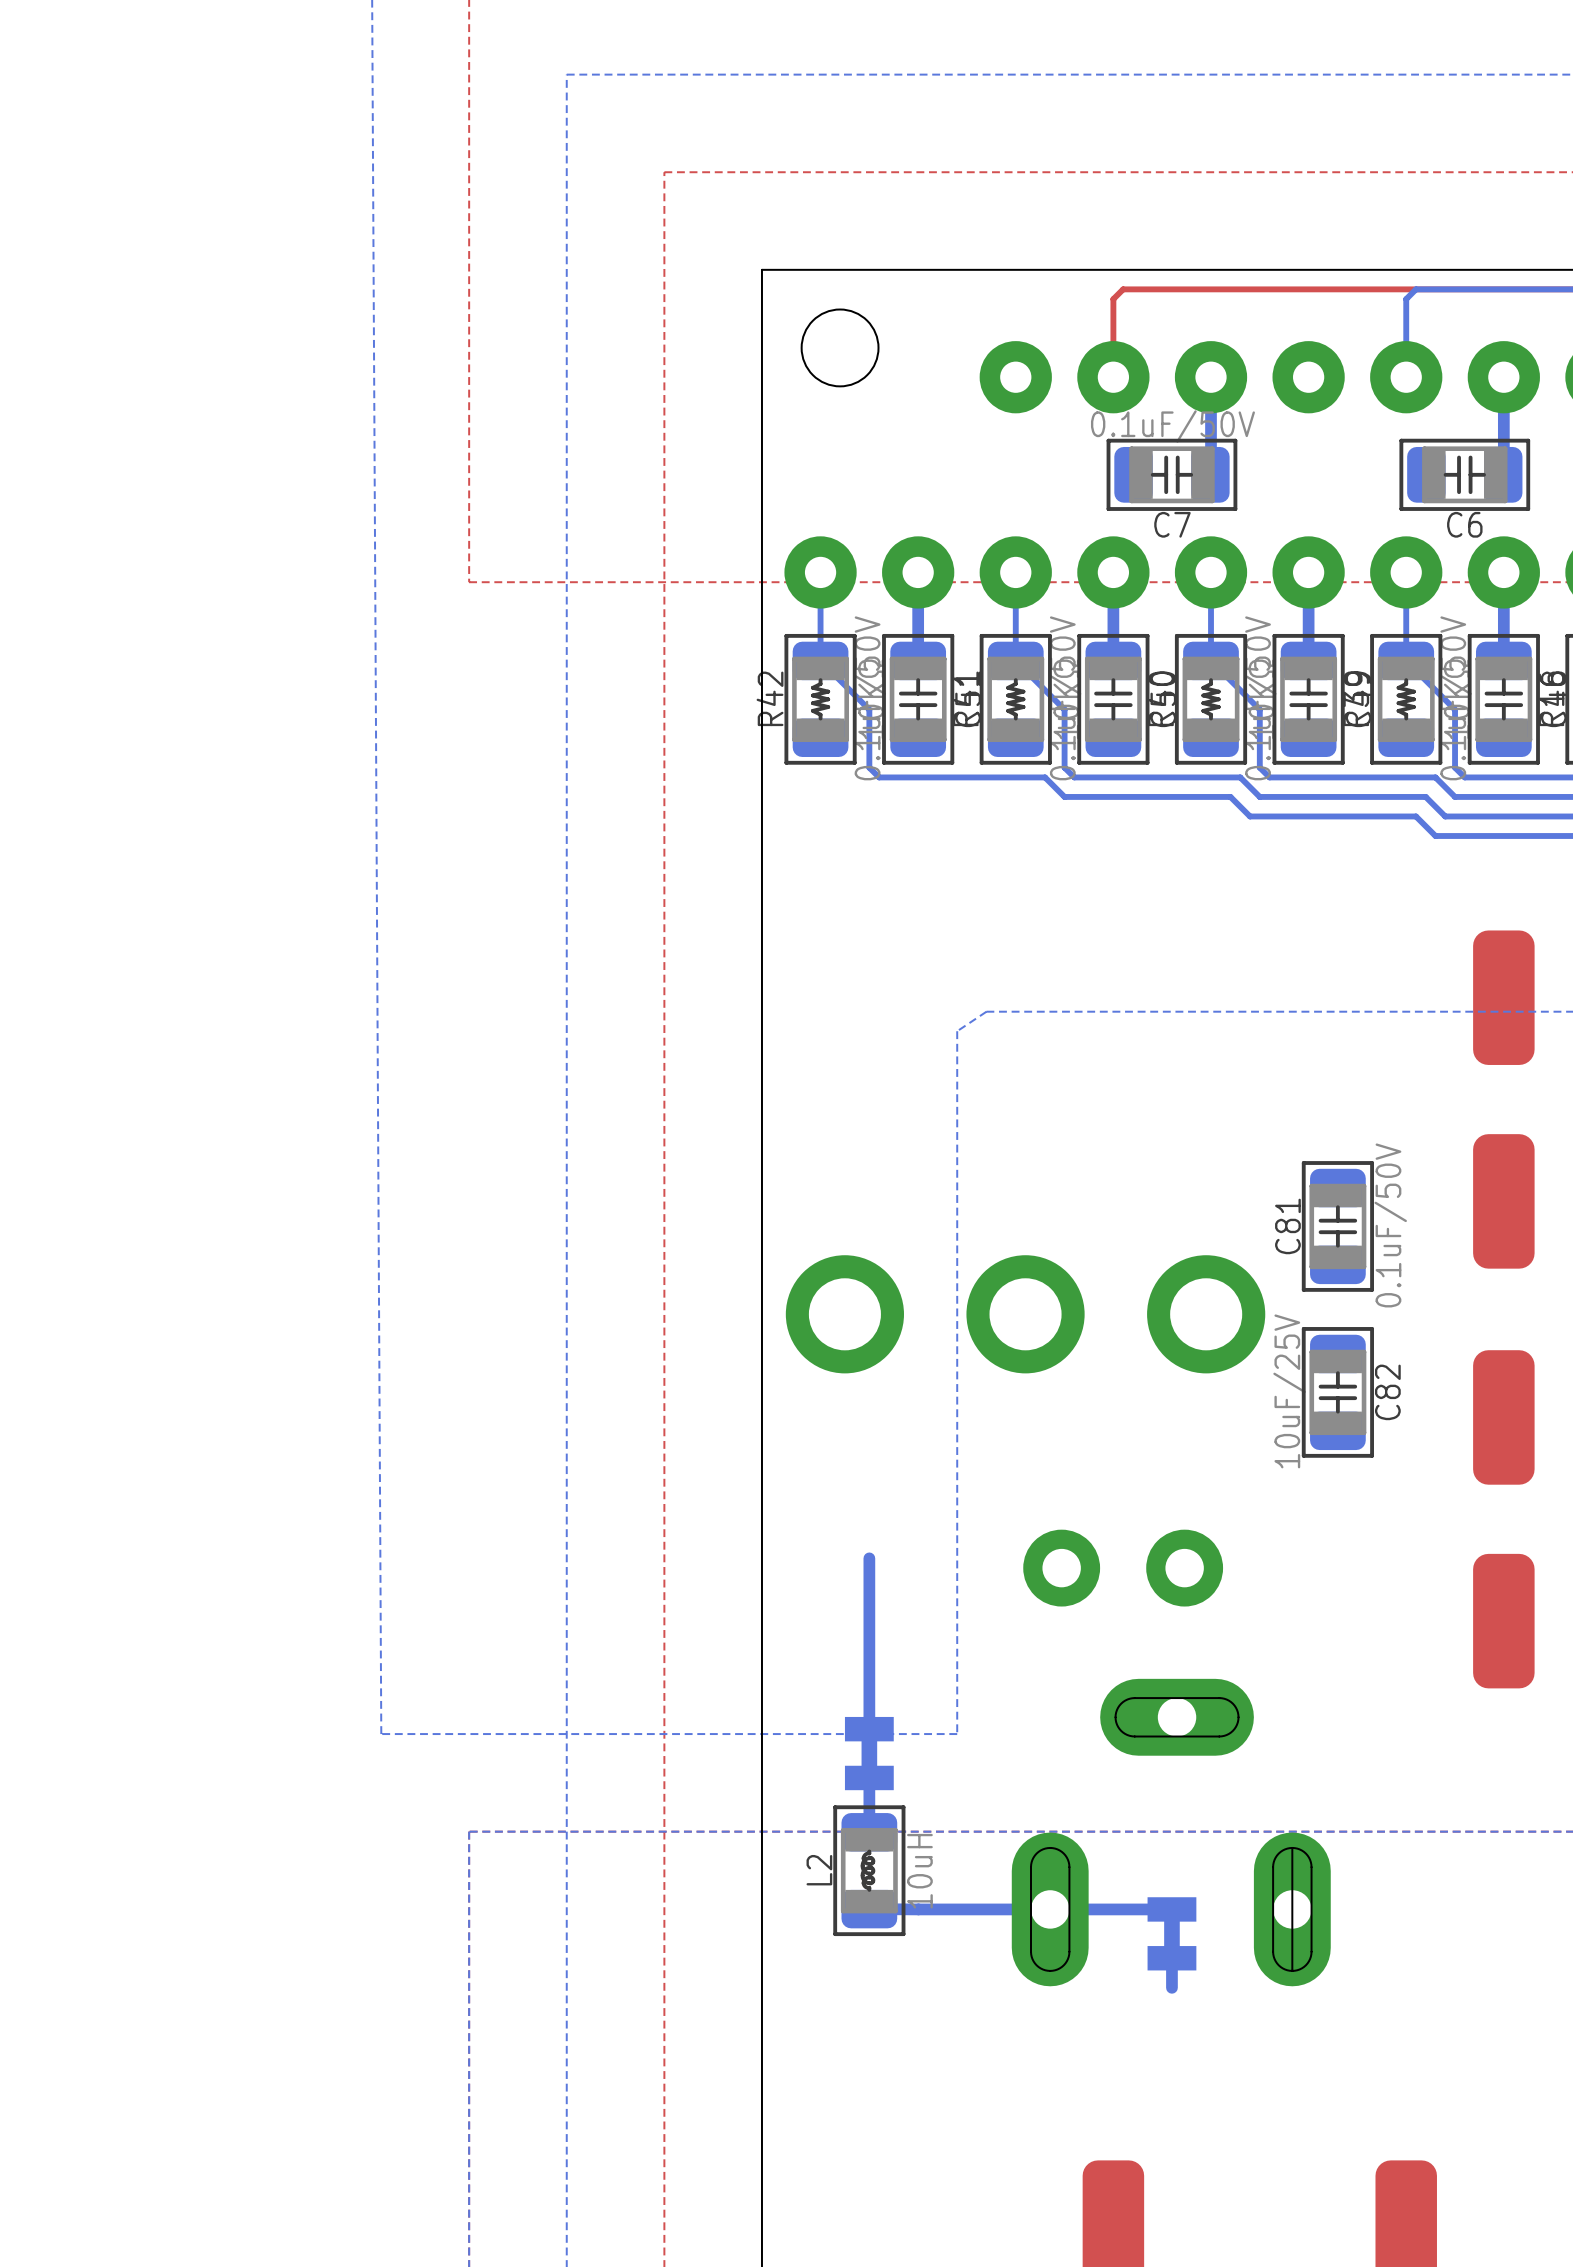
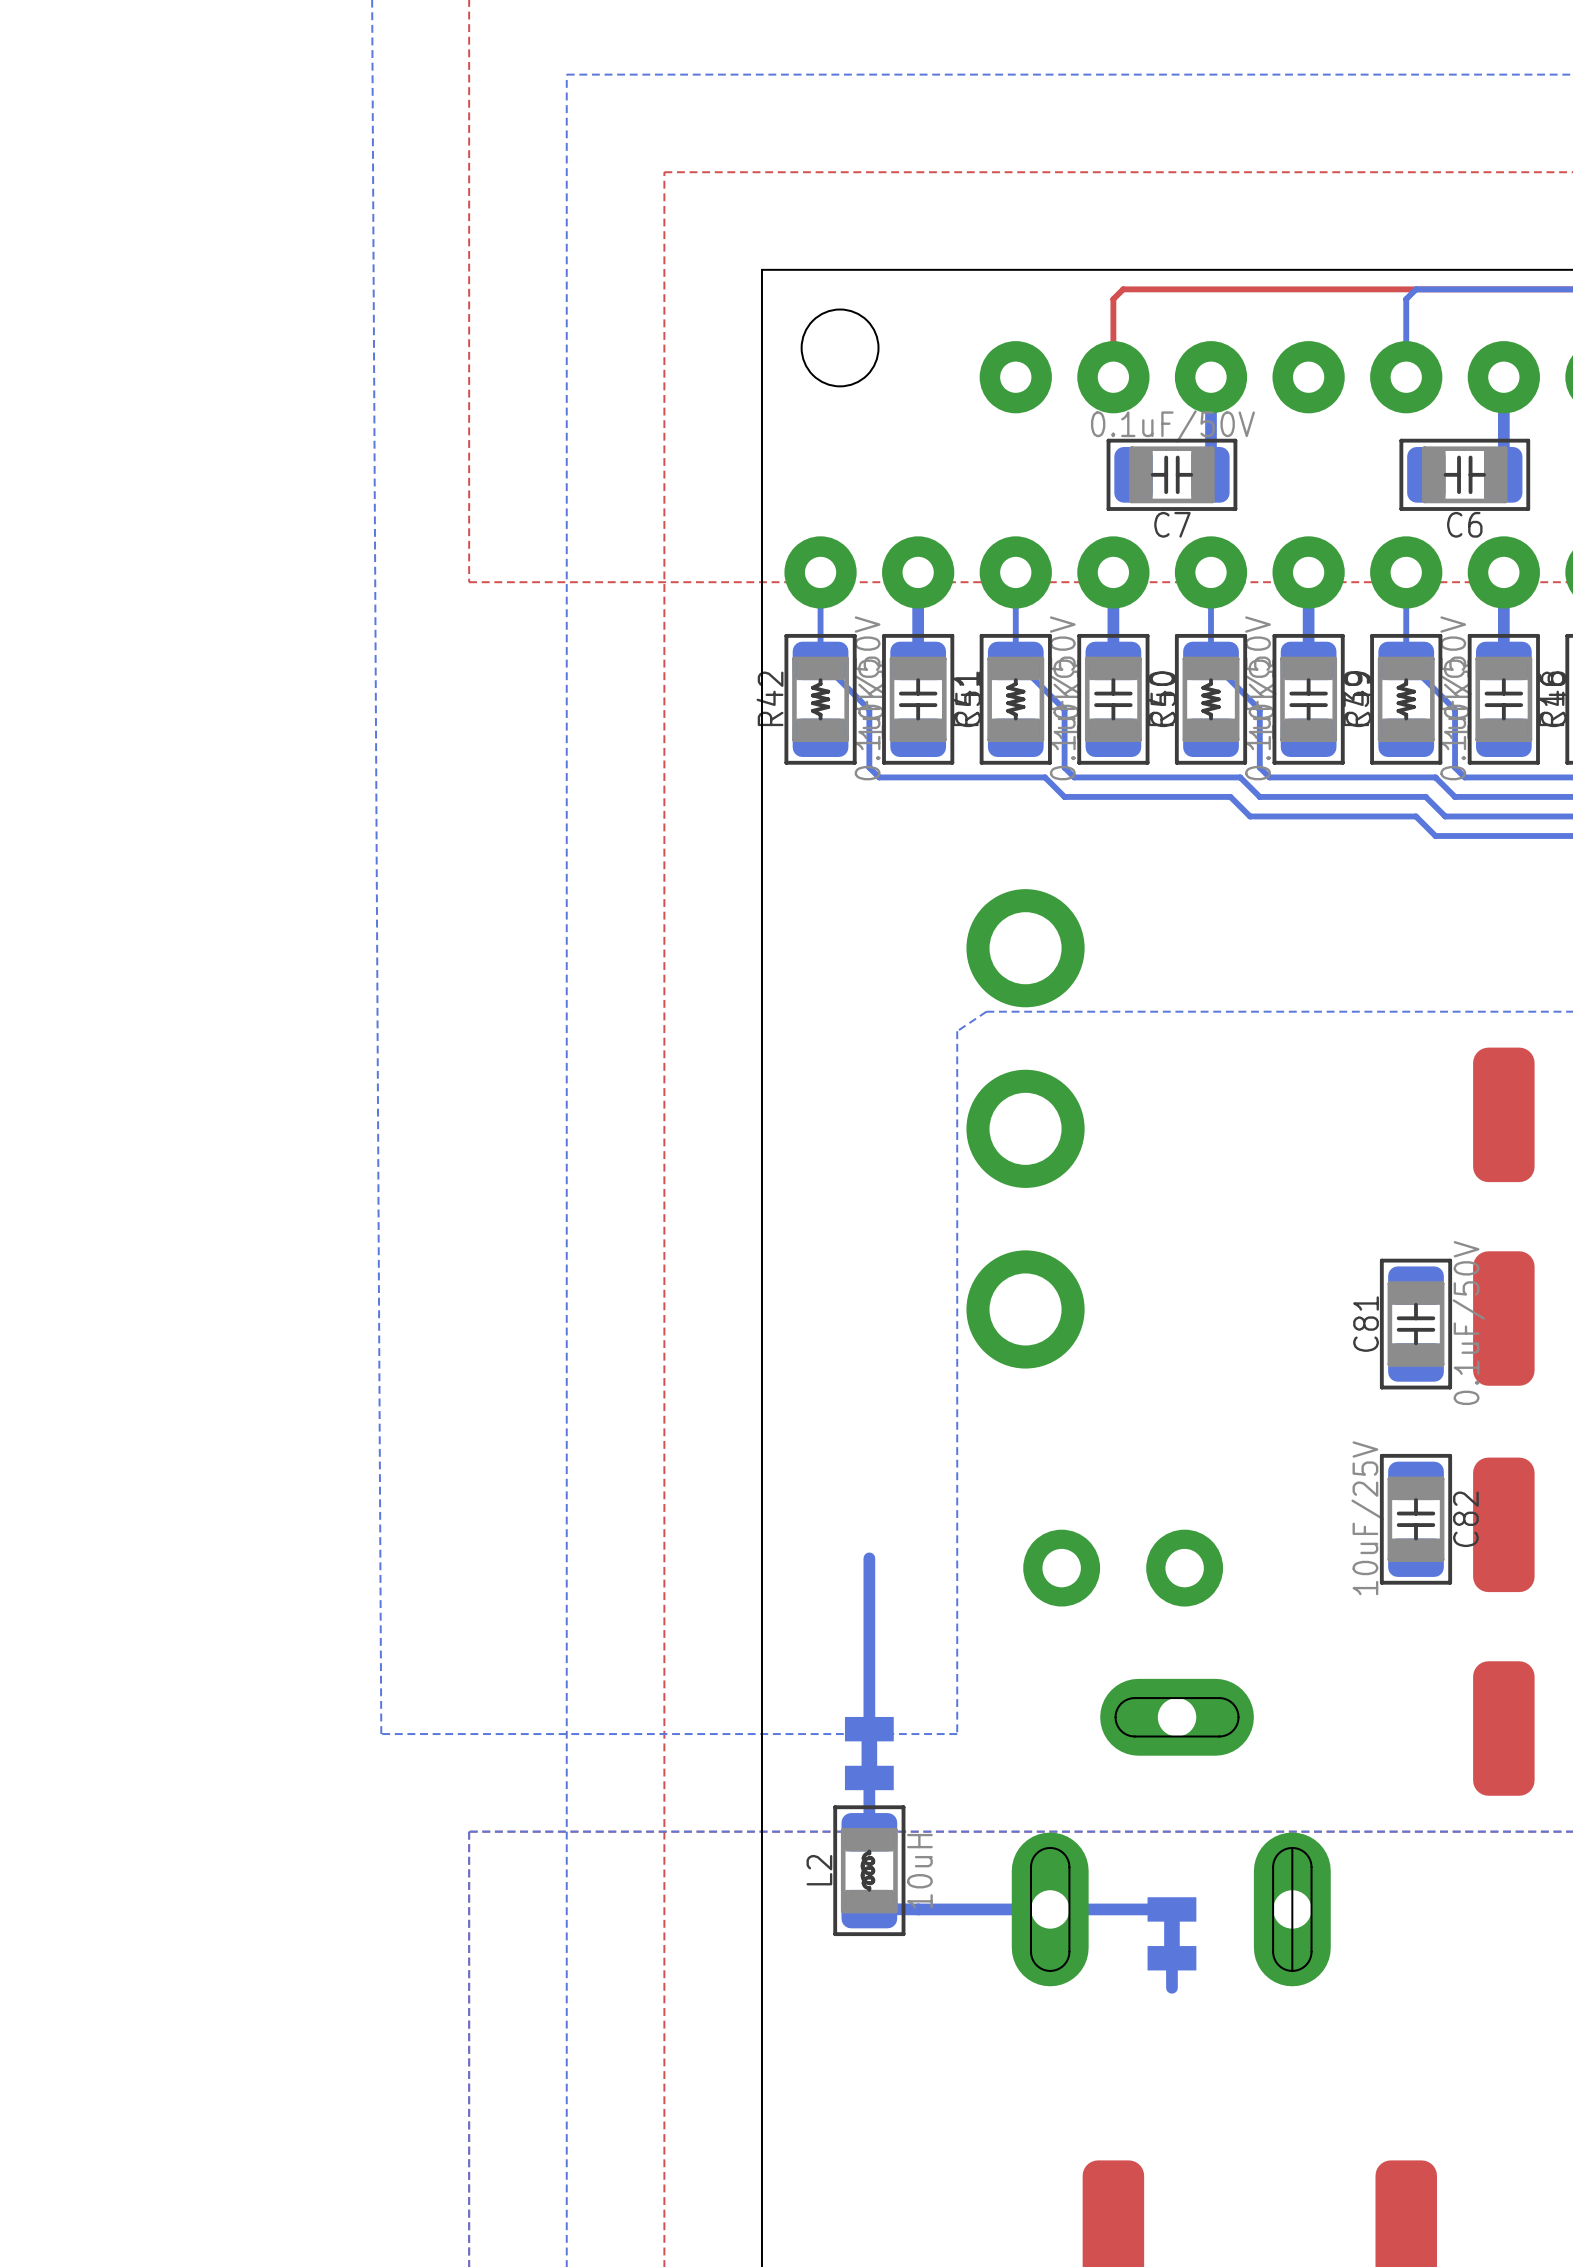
part position: (1503, 1099) -> (1503, 1216)
C81 position: (1337, 1226) -> (1415, 1324)
part rotation: 0° (1025, 1314) -> 90° clockwise (1025, 1128)
C82 position: (1337, 1392) -> (1415, 1519)
part position: (1503, 1519) -> (1503, 1626)

